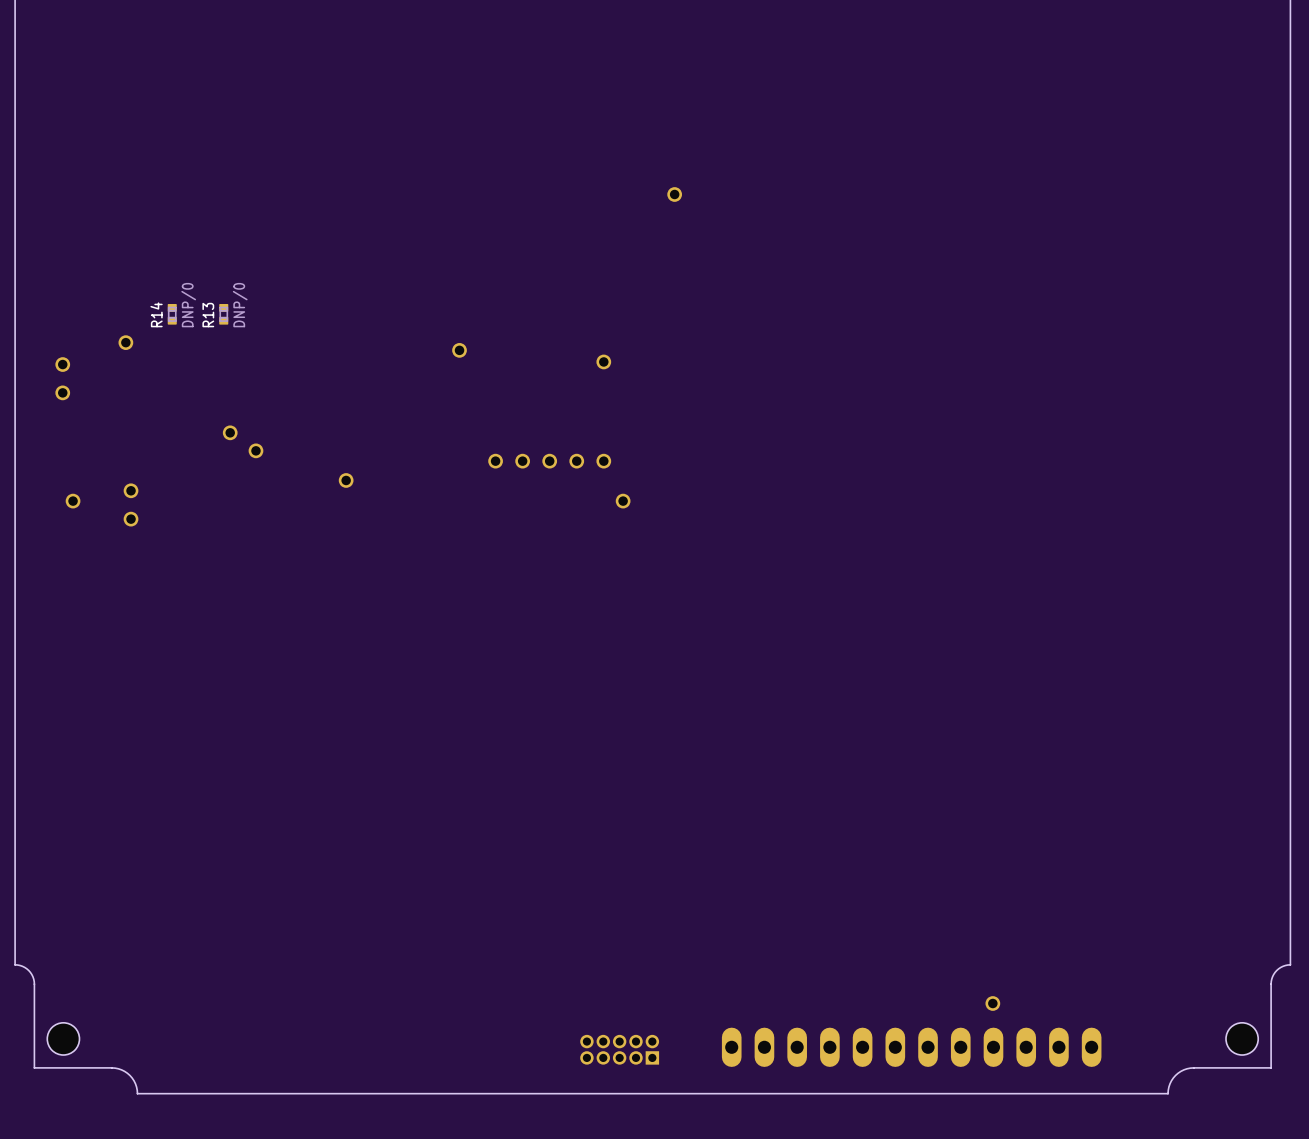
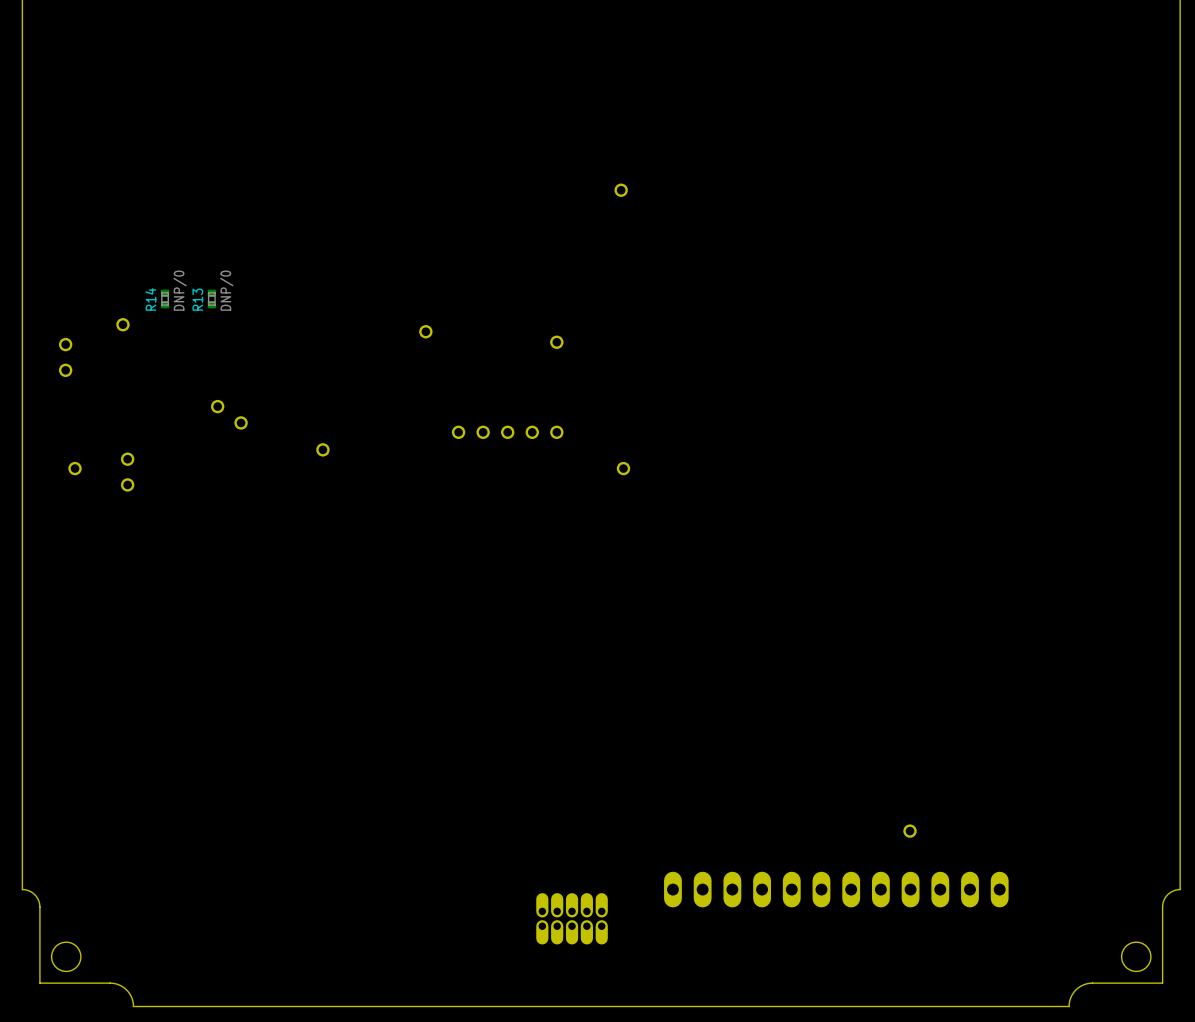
part position: (623, 501) -> (623, 468)
part: none -> (572, 918)
part position: (992, 1003) -> (910, 831)
part position: (911, 1047) -> (836, 889)
part: (619, 1049) -> none

